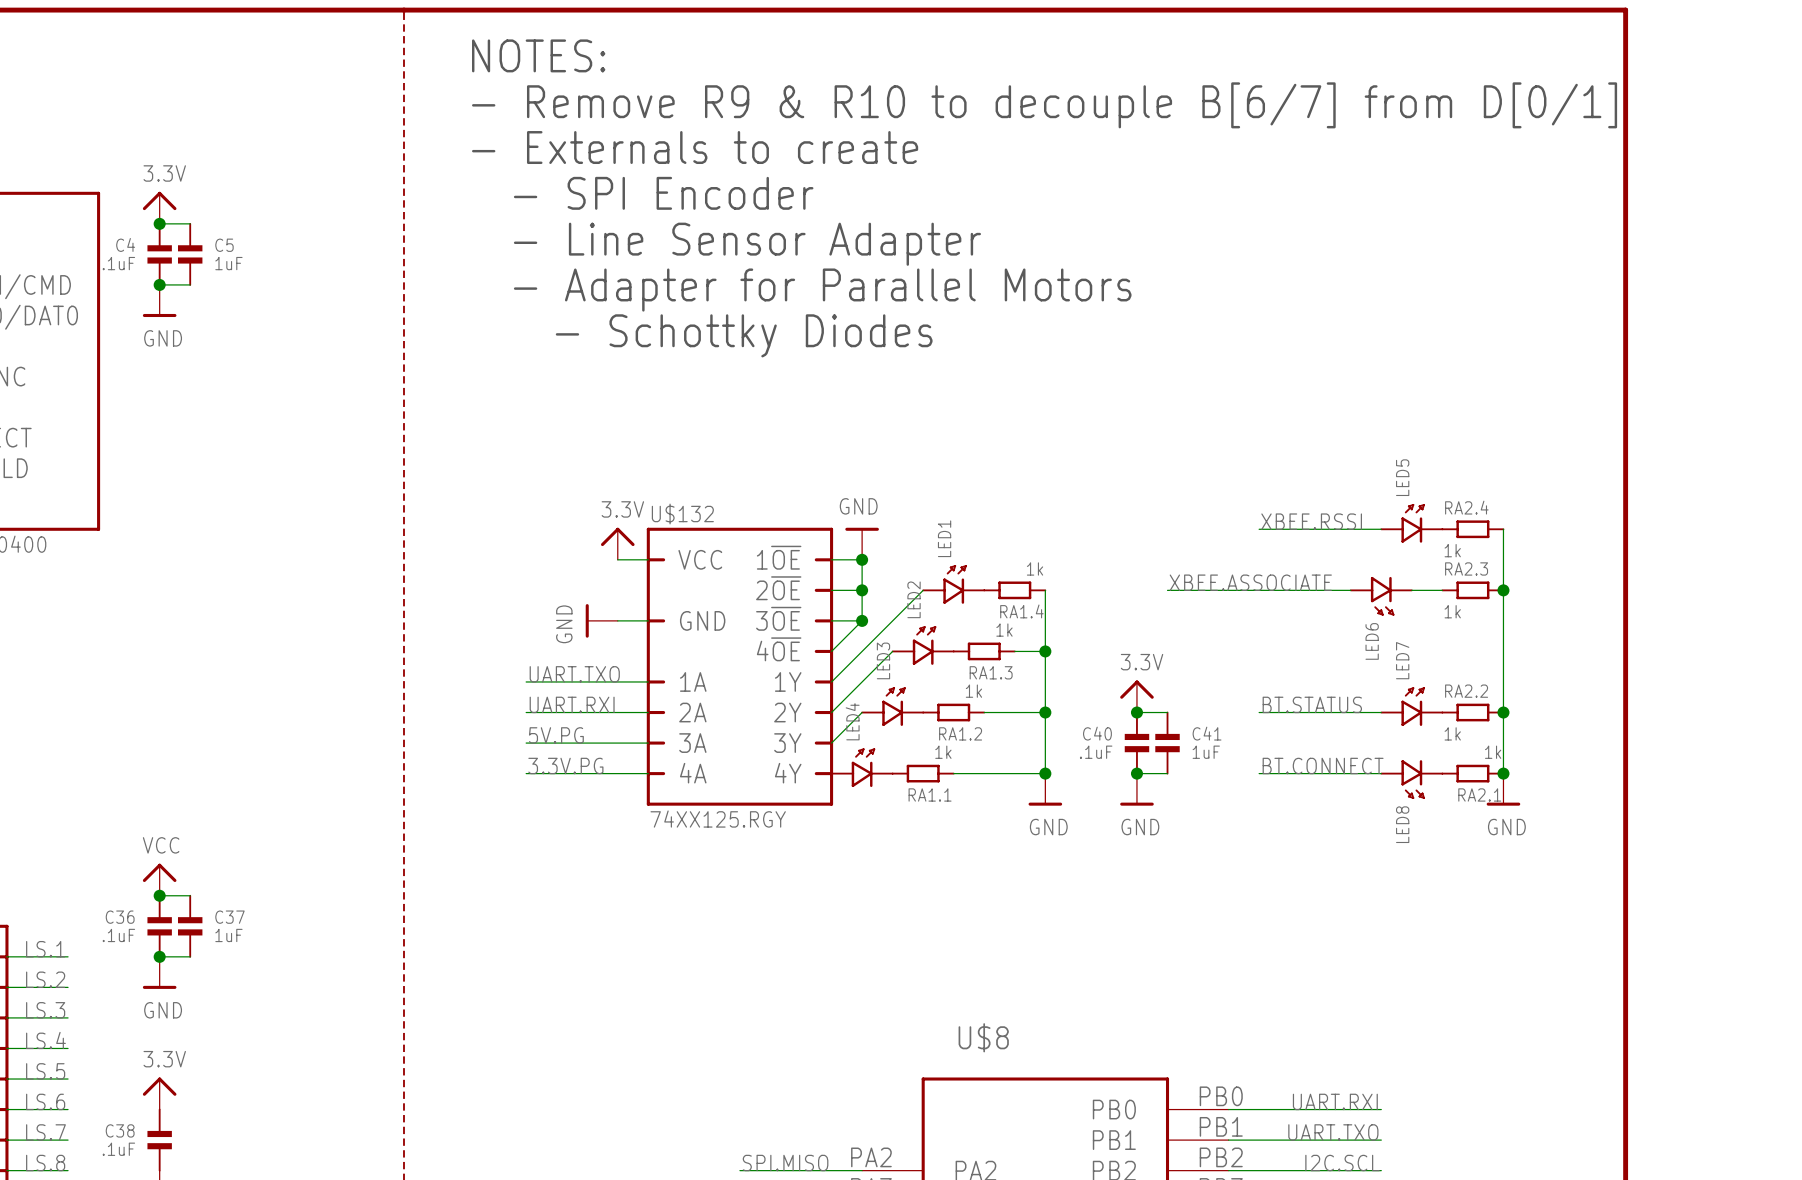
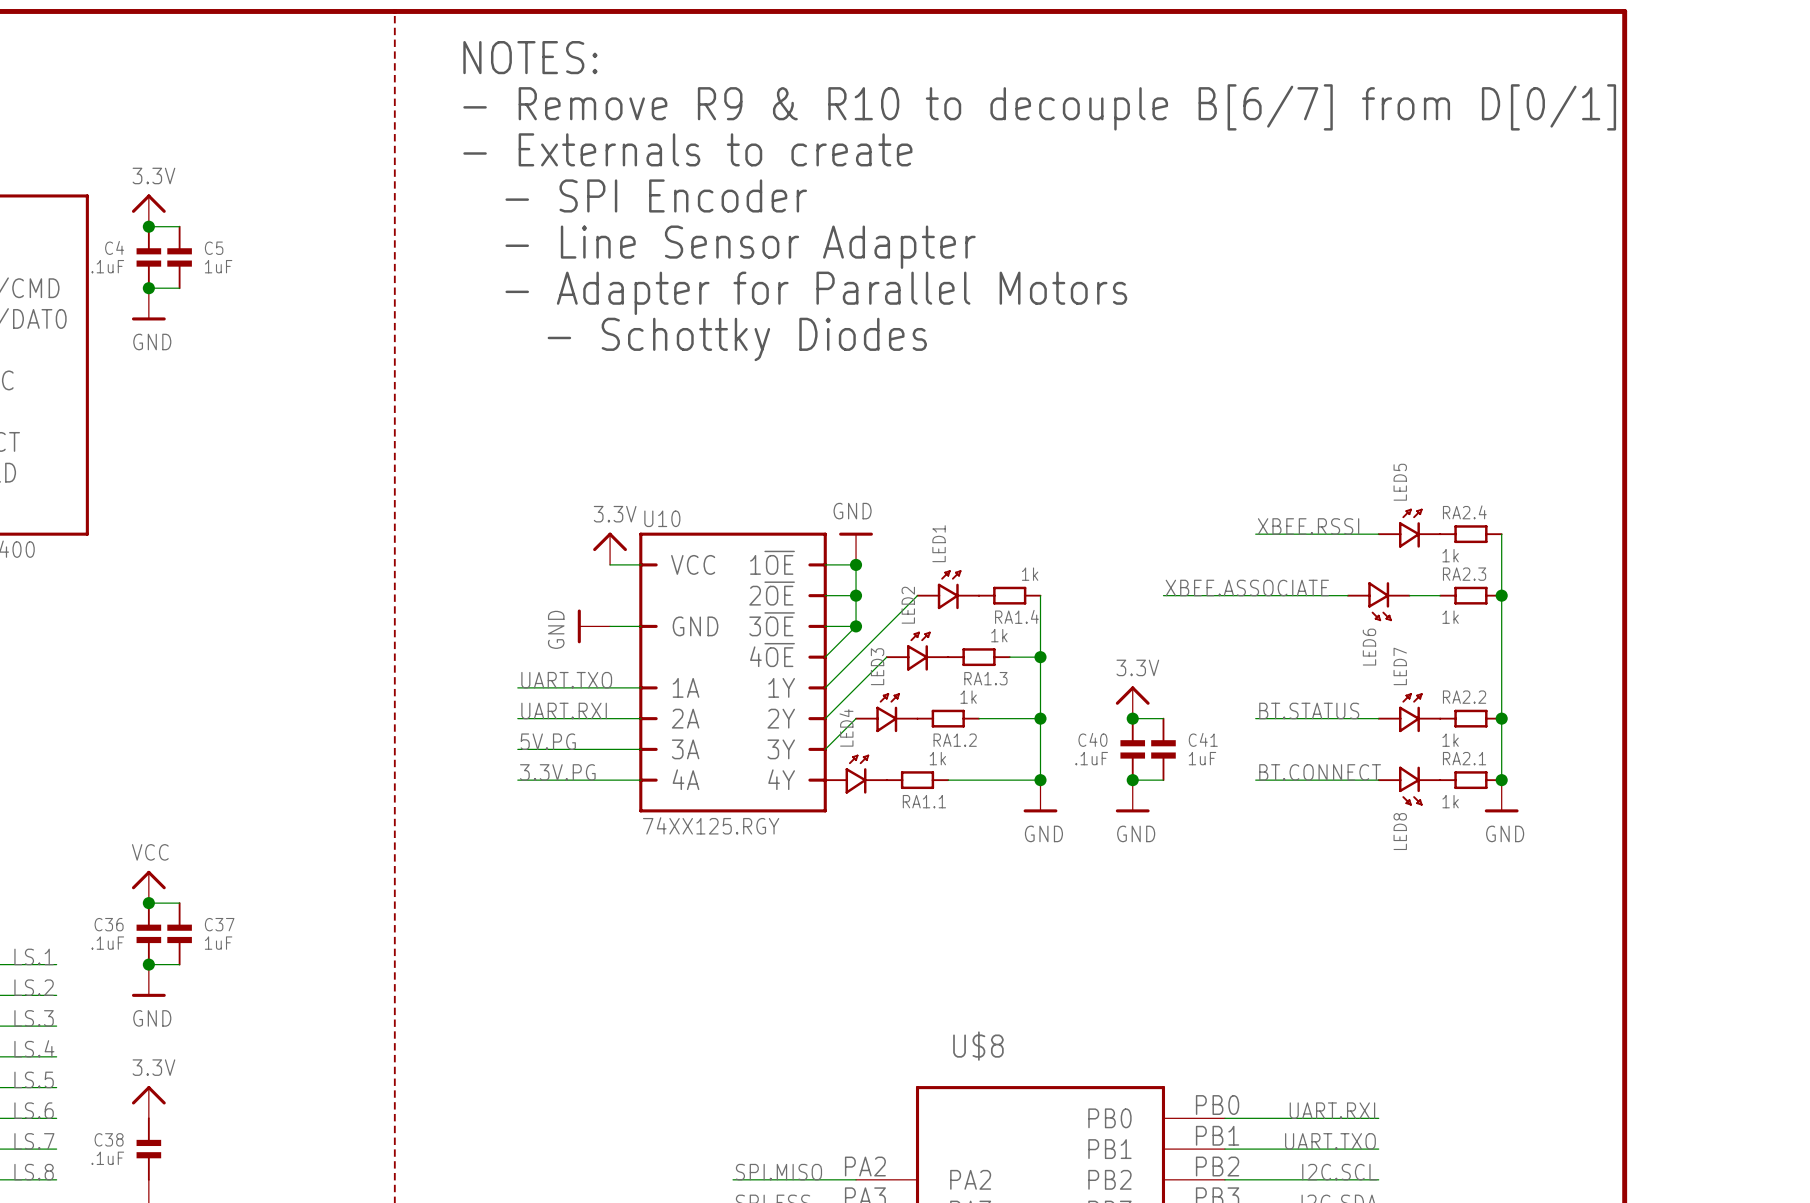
U$132 name: U$132 (682, 514) -> U10 (662, 518)
RA2.1 value position: 1k (1493, 752) -> 1k (1450, 801)
RA2.1 name position: RA2.1 (1479, 794) -> RA2.1 (1464, 758)

